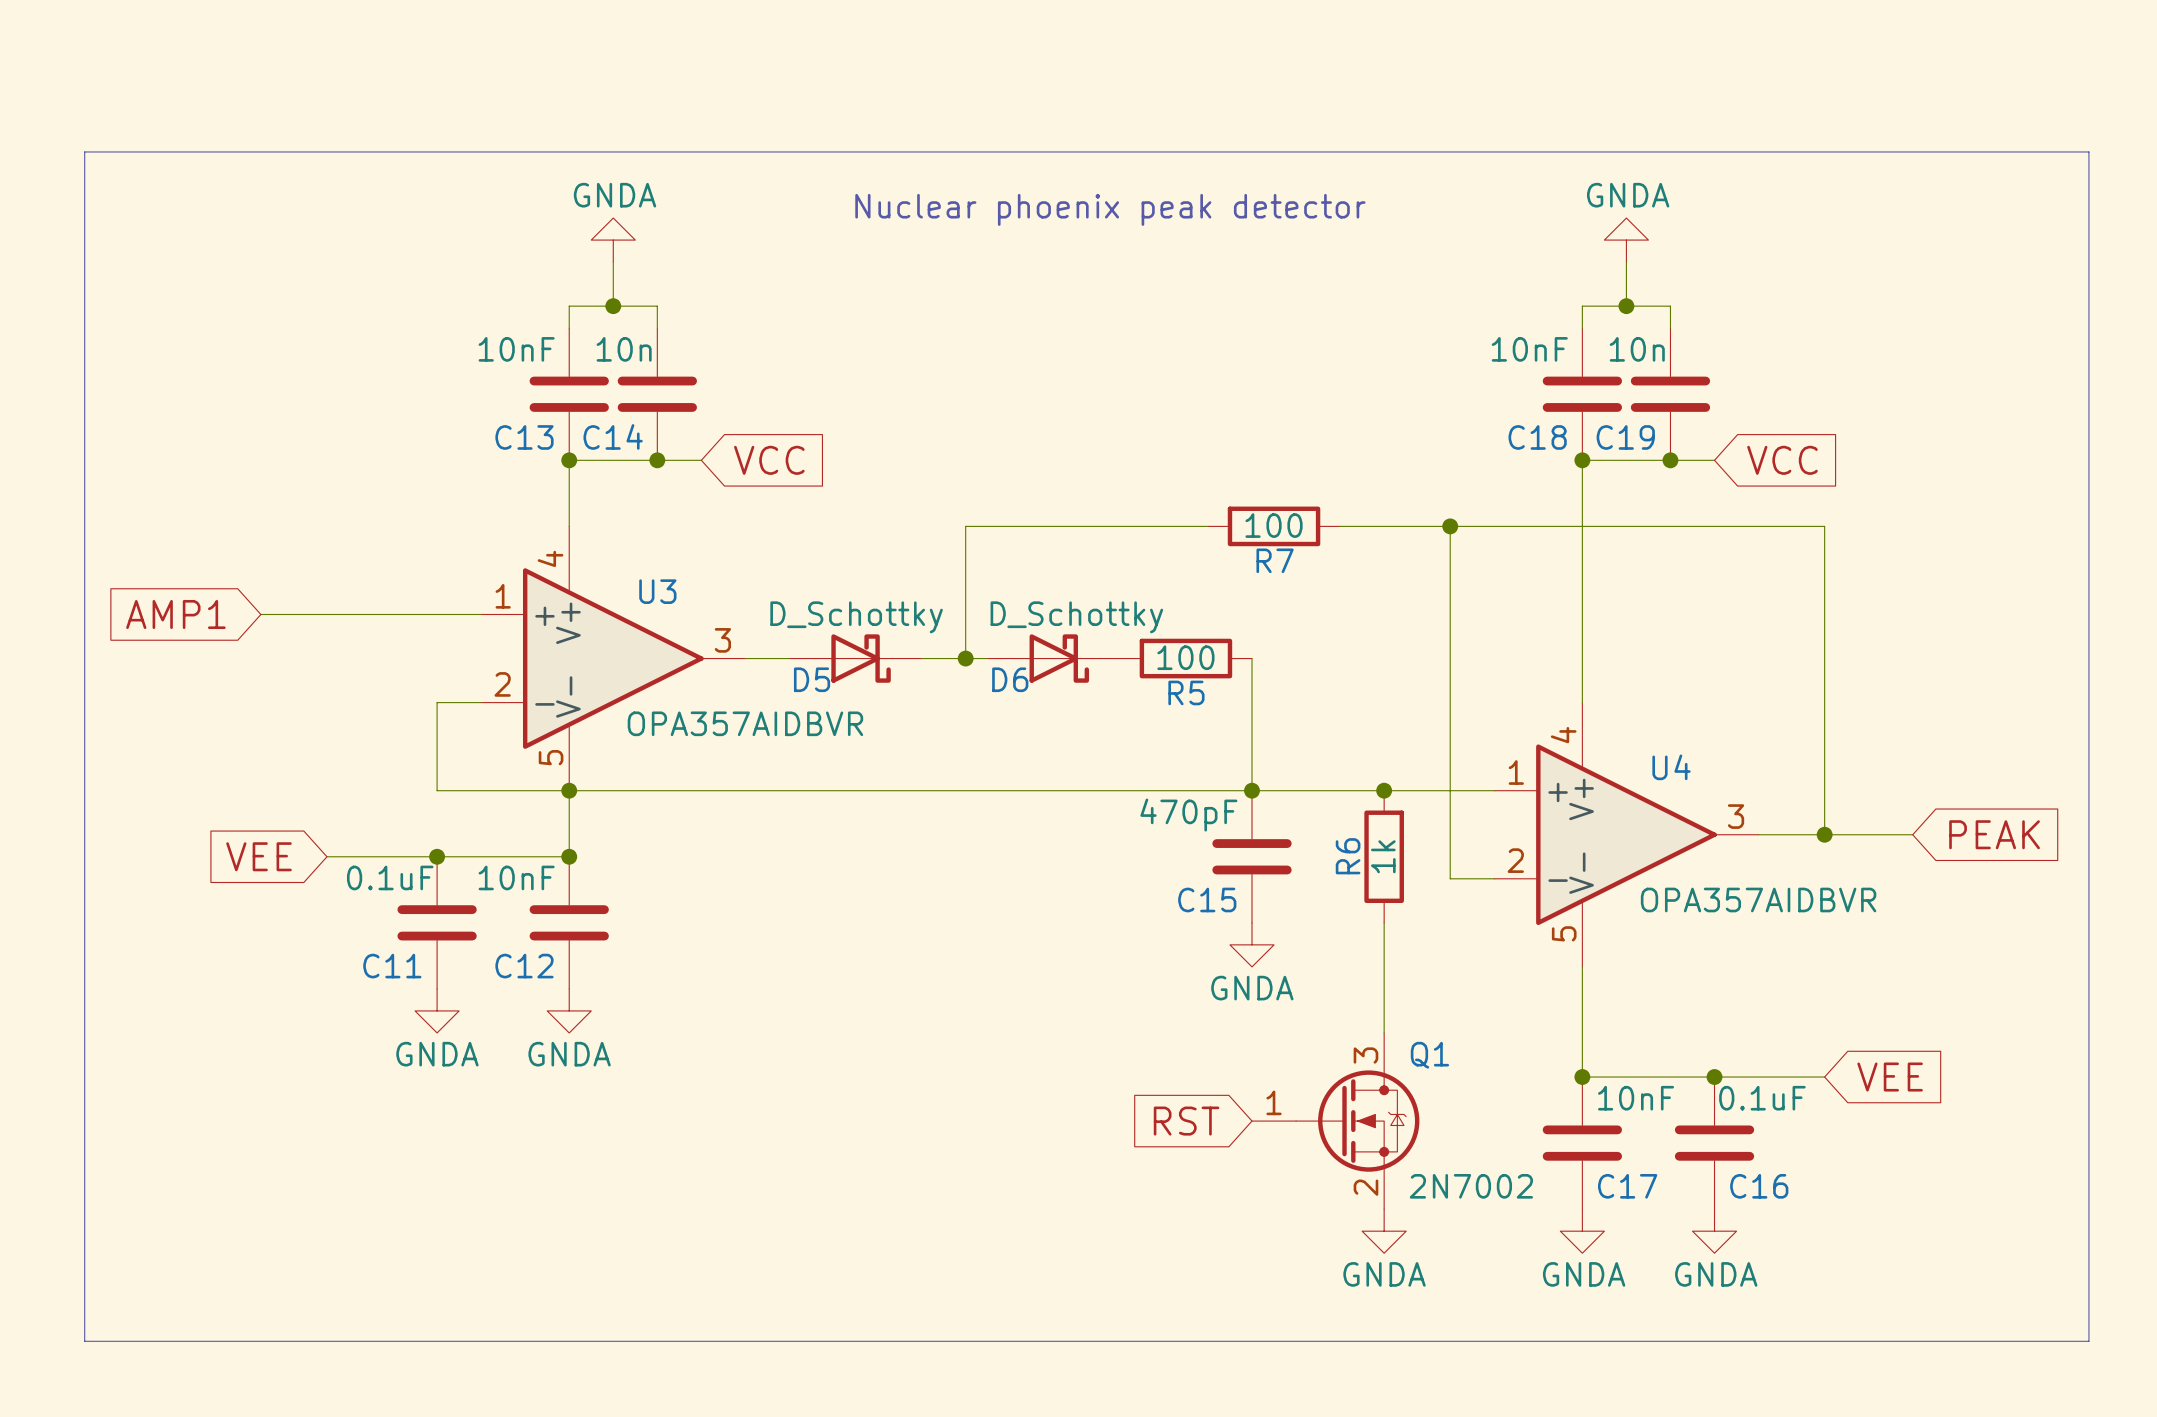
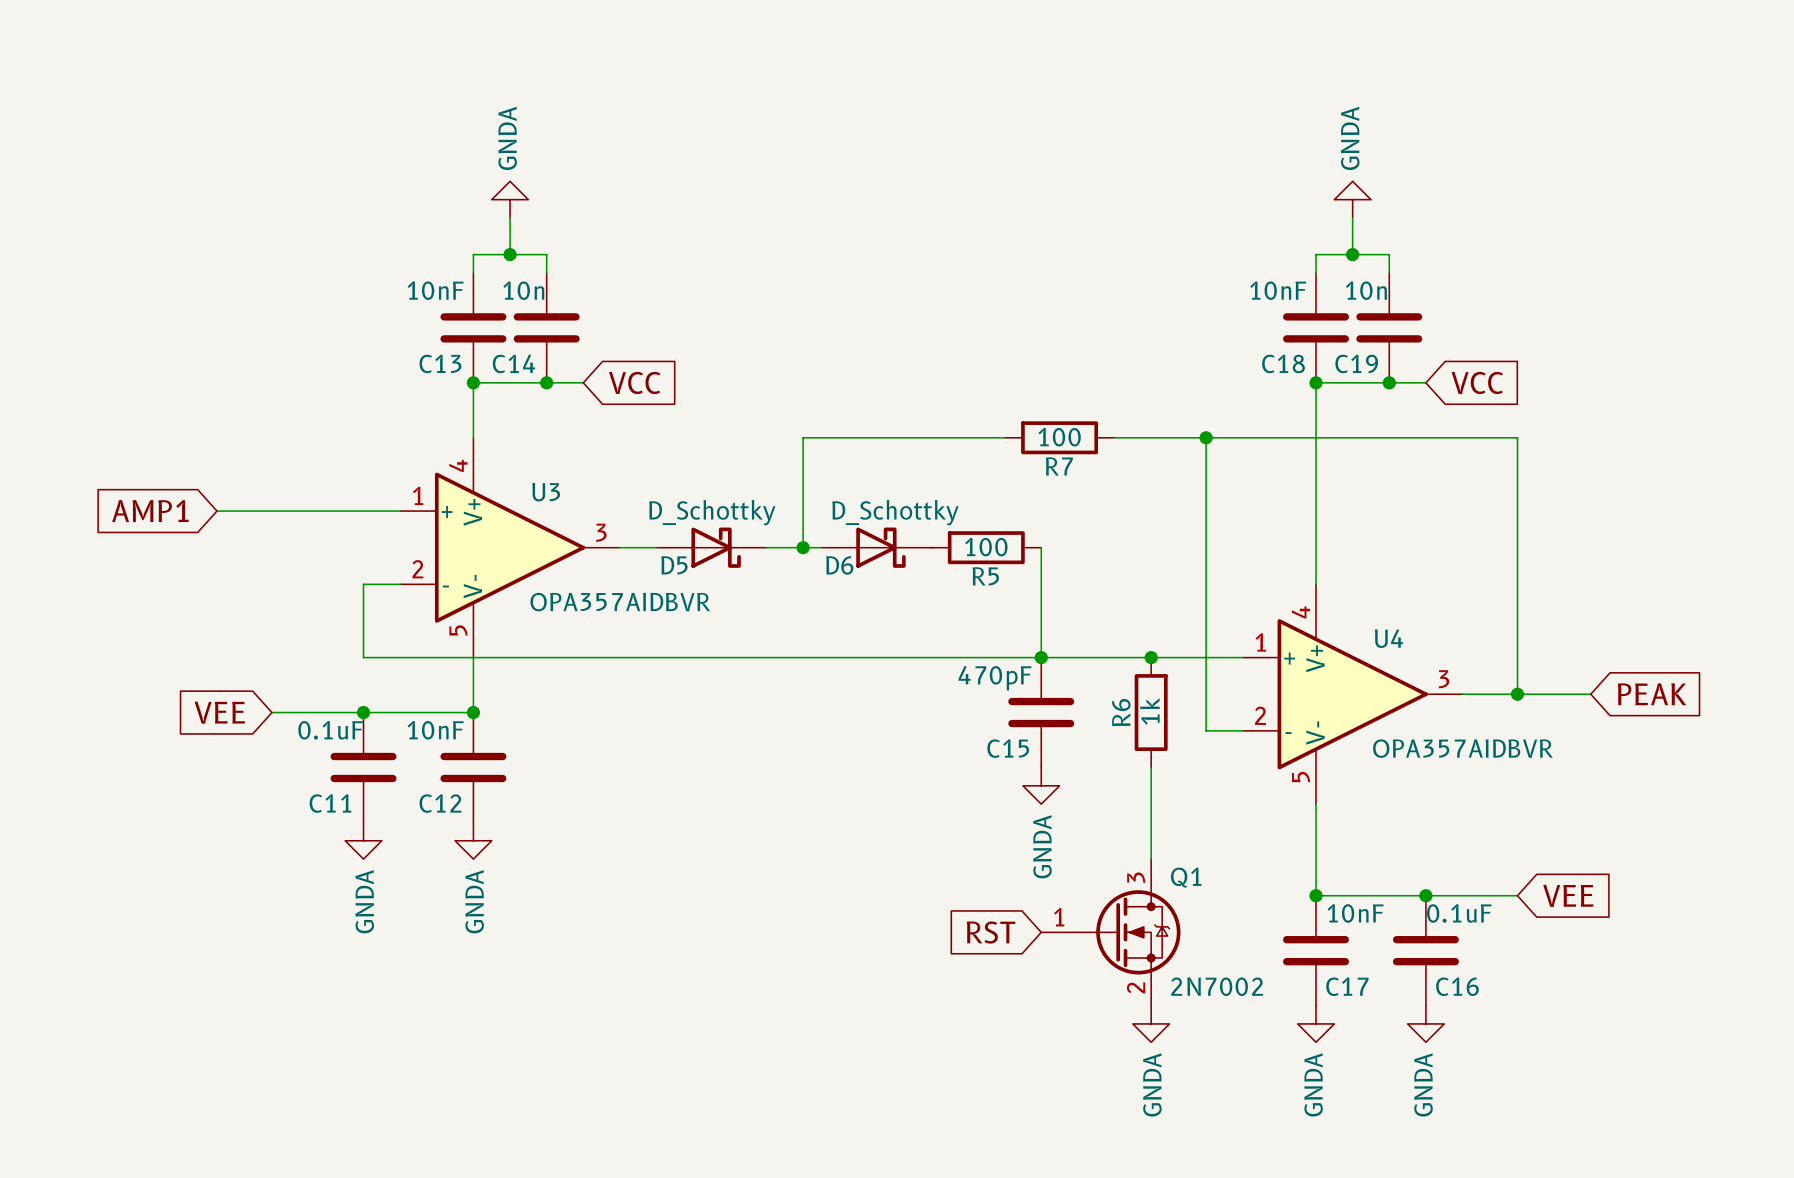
line: (84, 151) (2088, 151) (2088, 1341) (84, 1341) (84, 151) -> none
power symbol text rotation: 0° (615, 195) -> 90° counterclockwise (507, 138)
power symbol text rotation: 0° (1628, 195) -> 90° counterclockwise (1350, 138)
text: Nuclear phoenix peak detector (1110, 209) -> none
junction: (569, 790) -> none
power symbol text rotation: 0° (1252, 988) -> 90° counterclockwise (1042, 846)
power symbol text rotation: 0° (437, 1054) -> 90° counterclockwise (364, 901)
power symbol text rotation: 0° (569, 1054) -> 90° counterclockwise (474, 901)
power symbol text rotation: 0° (1384, 1274) -> 90° counterclockwise (1152, 1084)
power symbol text rotation: 0° (1584, 1274) -> 90° counterclockwise (1313, 1084)
power symbol text rotation: 0° (1716, 1274) -> 90° counterclockwise (1423, 1084)

